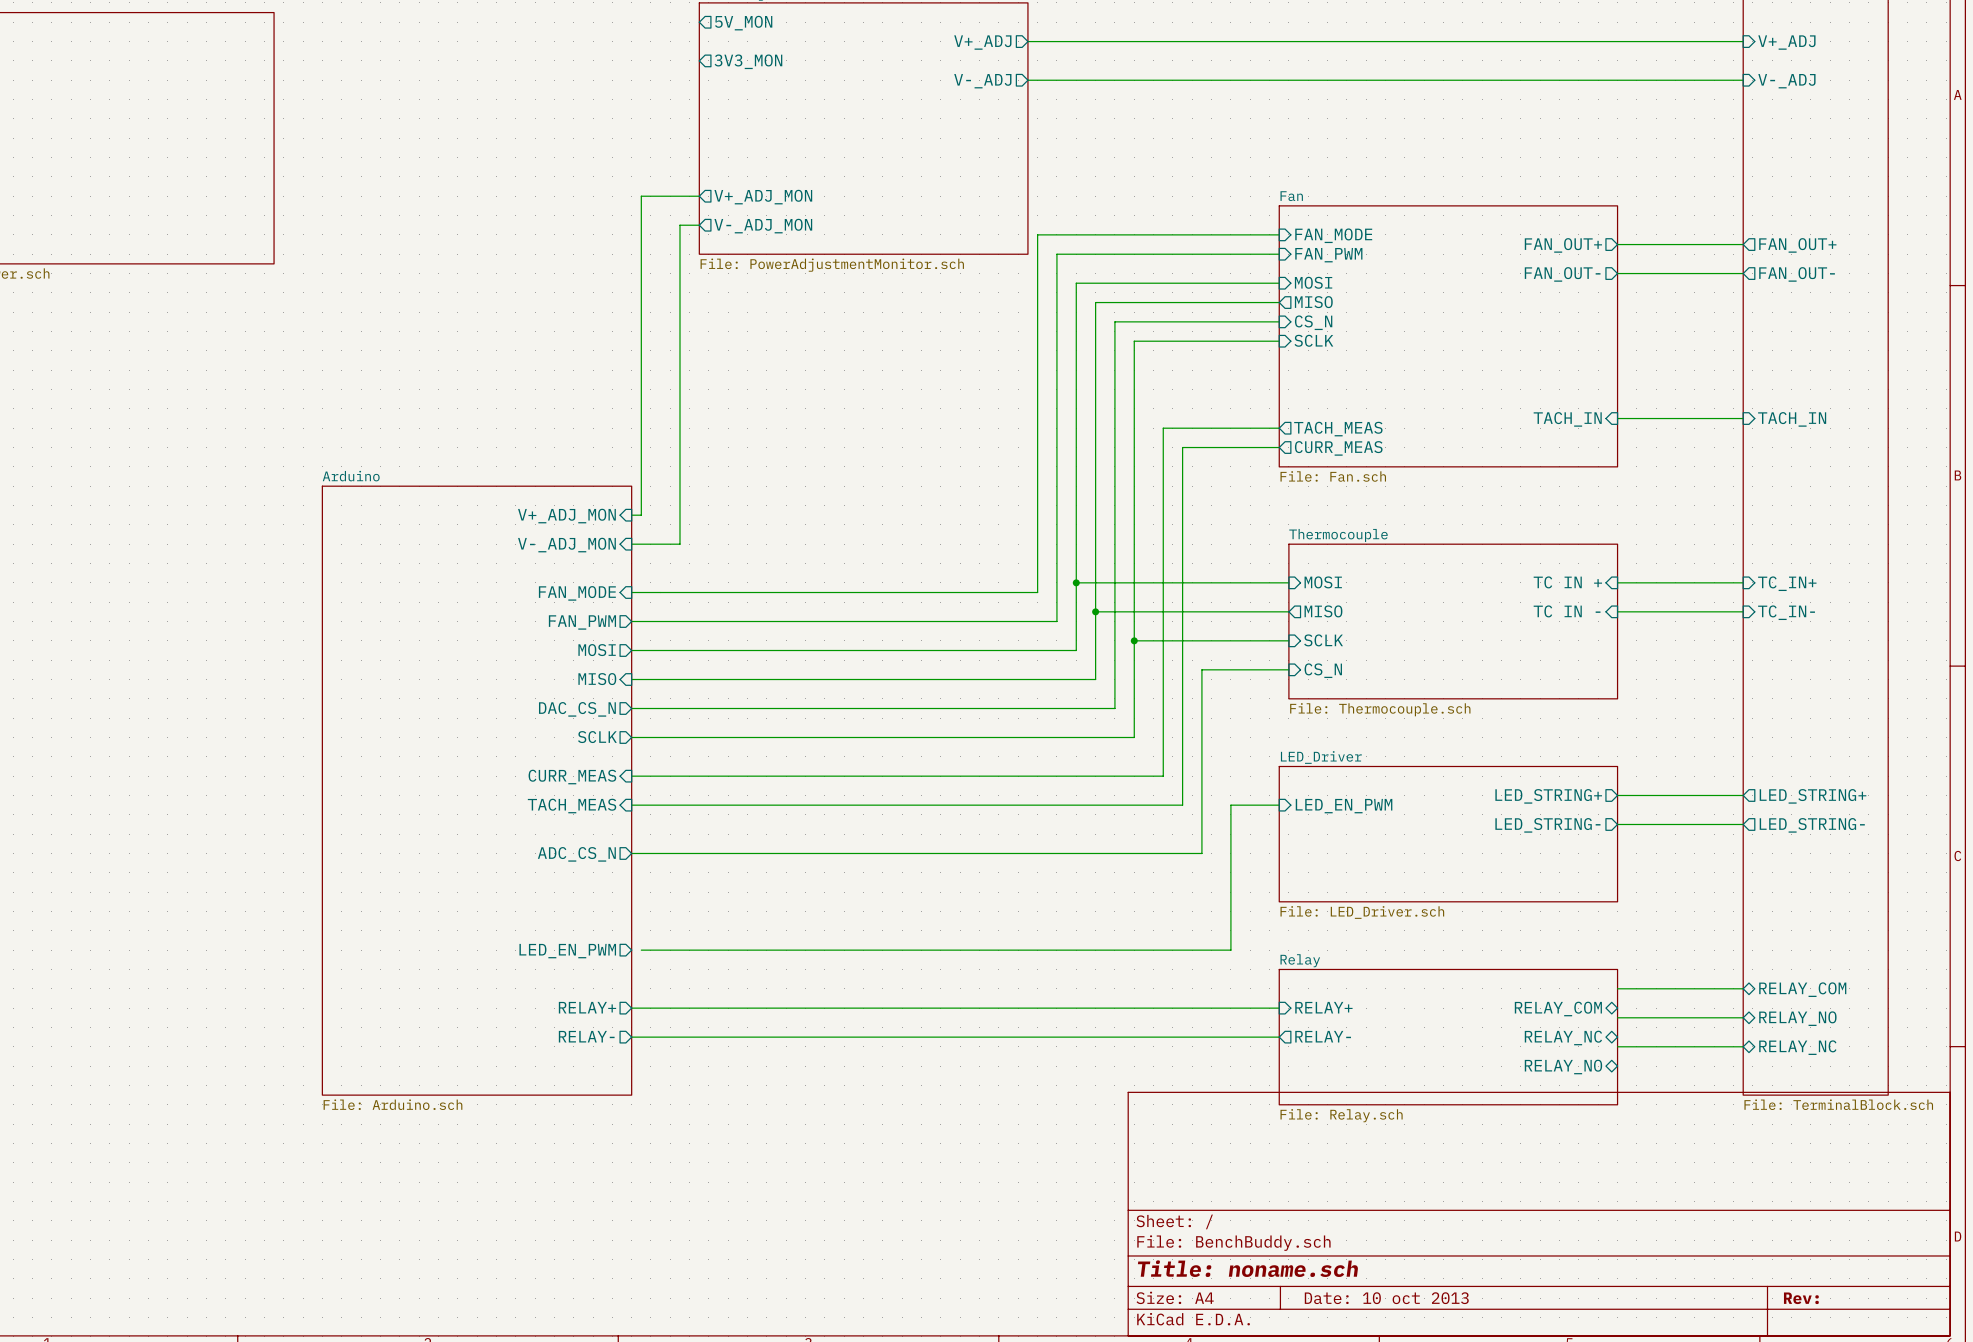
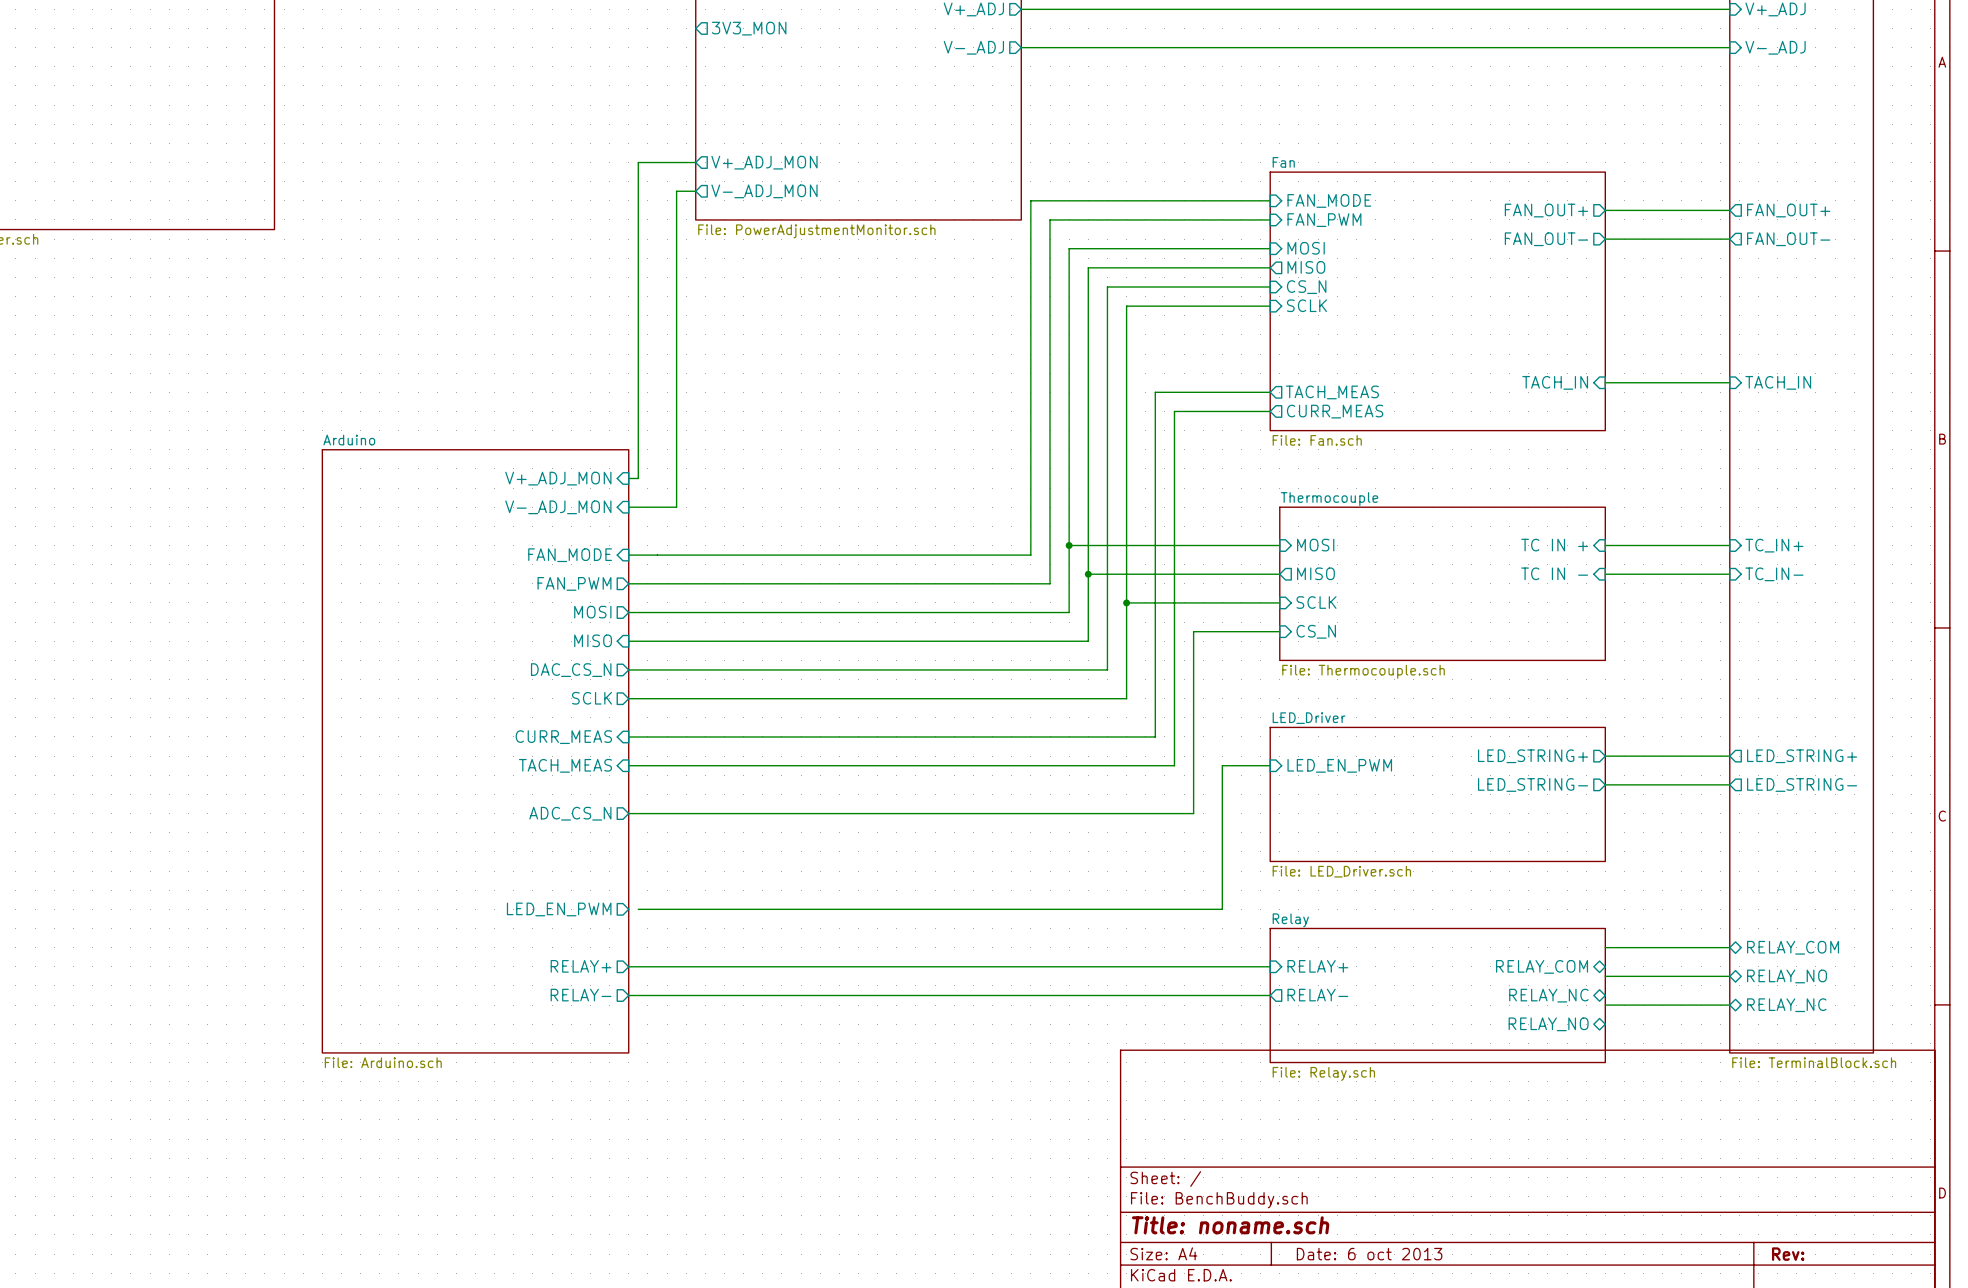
title block: Date: 10 oct 2013 (1386, 1298) -> Date: 6 oct 2013 (1369, 1254)

